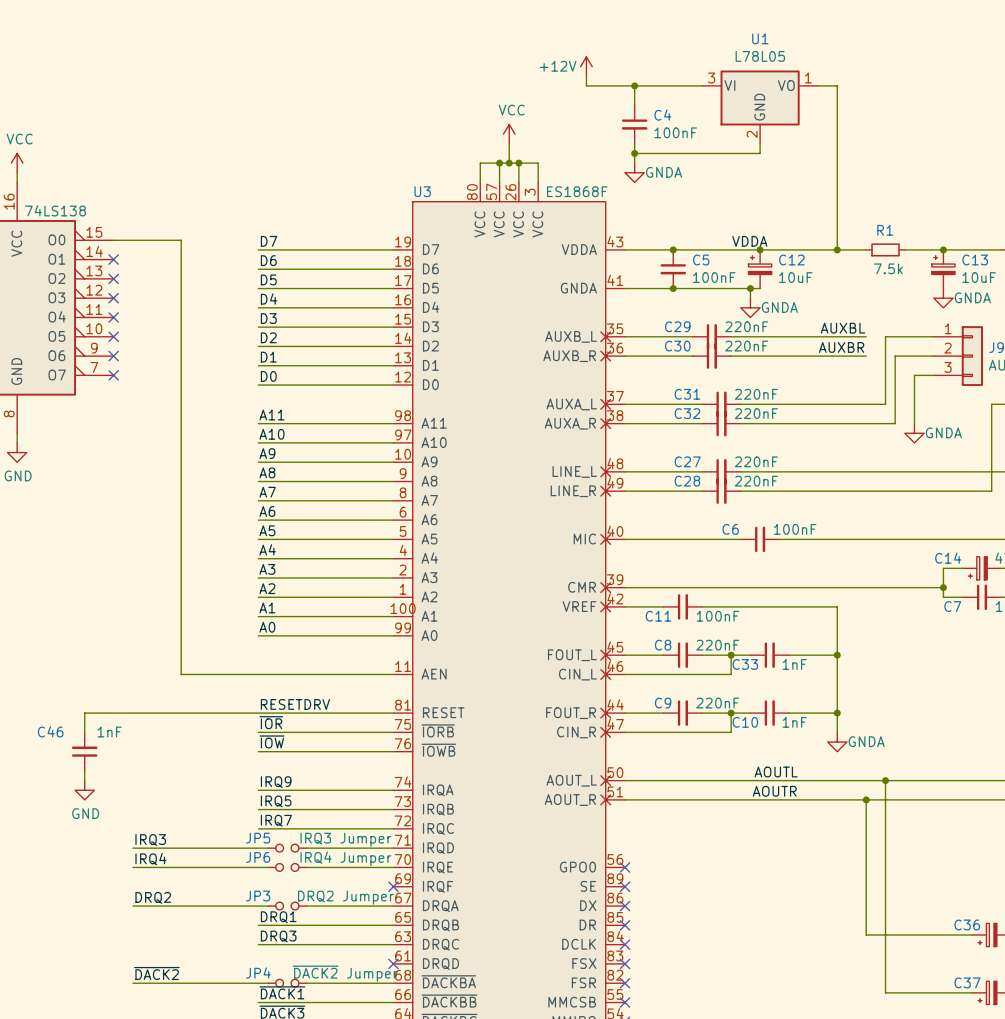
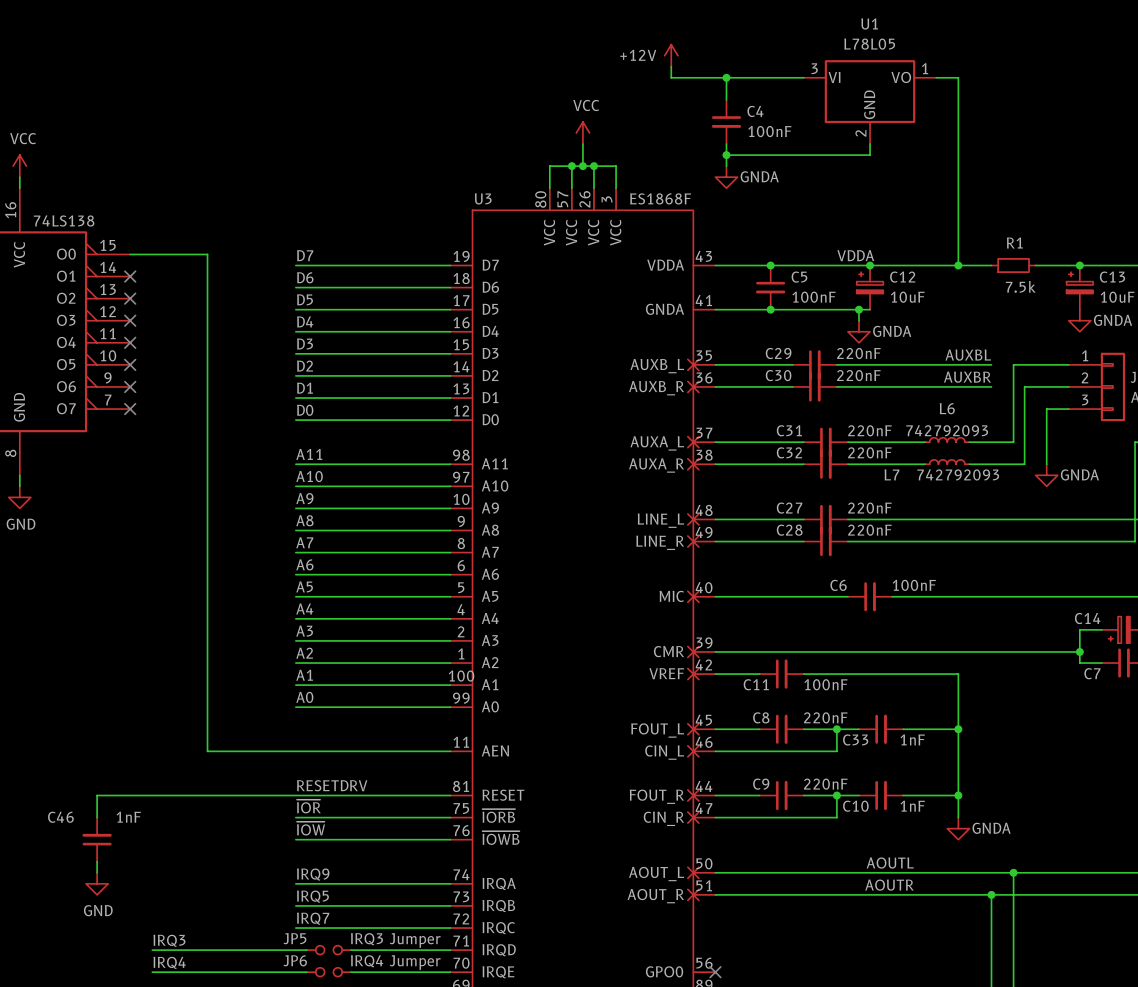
L6: none -> 742792093 (947, 439)
wire: (808, 404) (846, 404) -> none
L7: none -> 742792093 (947, 462)
wire: (808, 423) (846, 423) -> none

